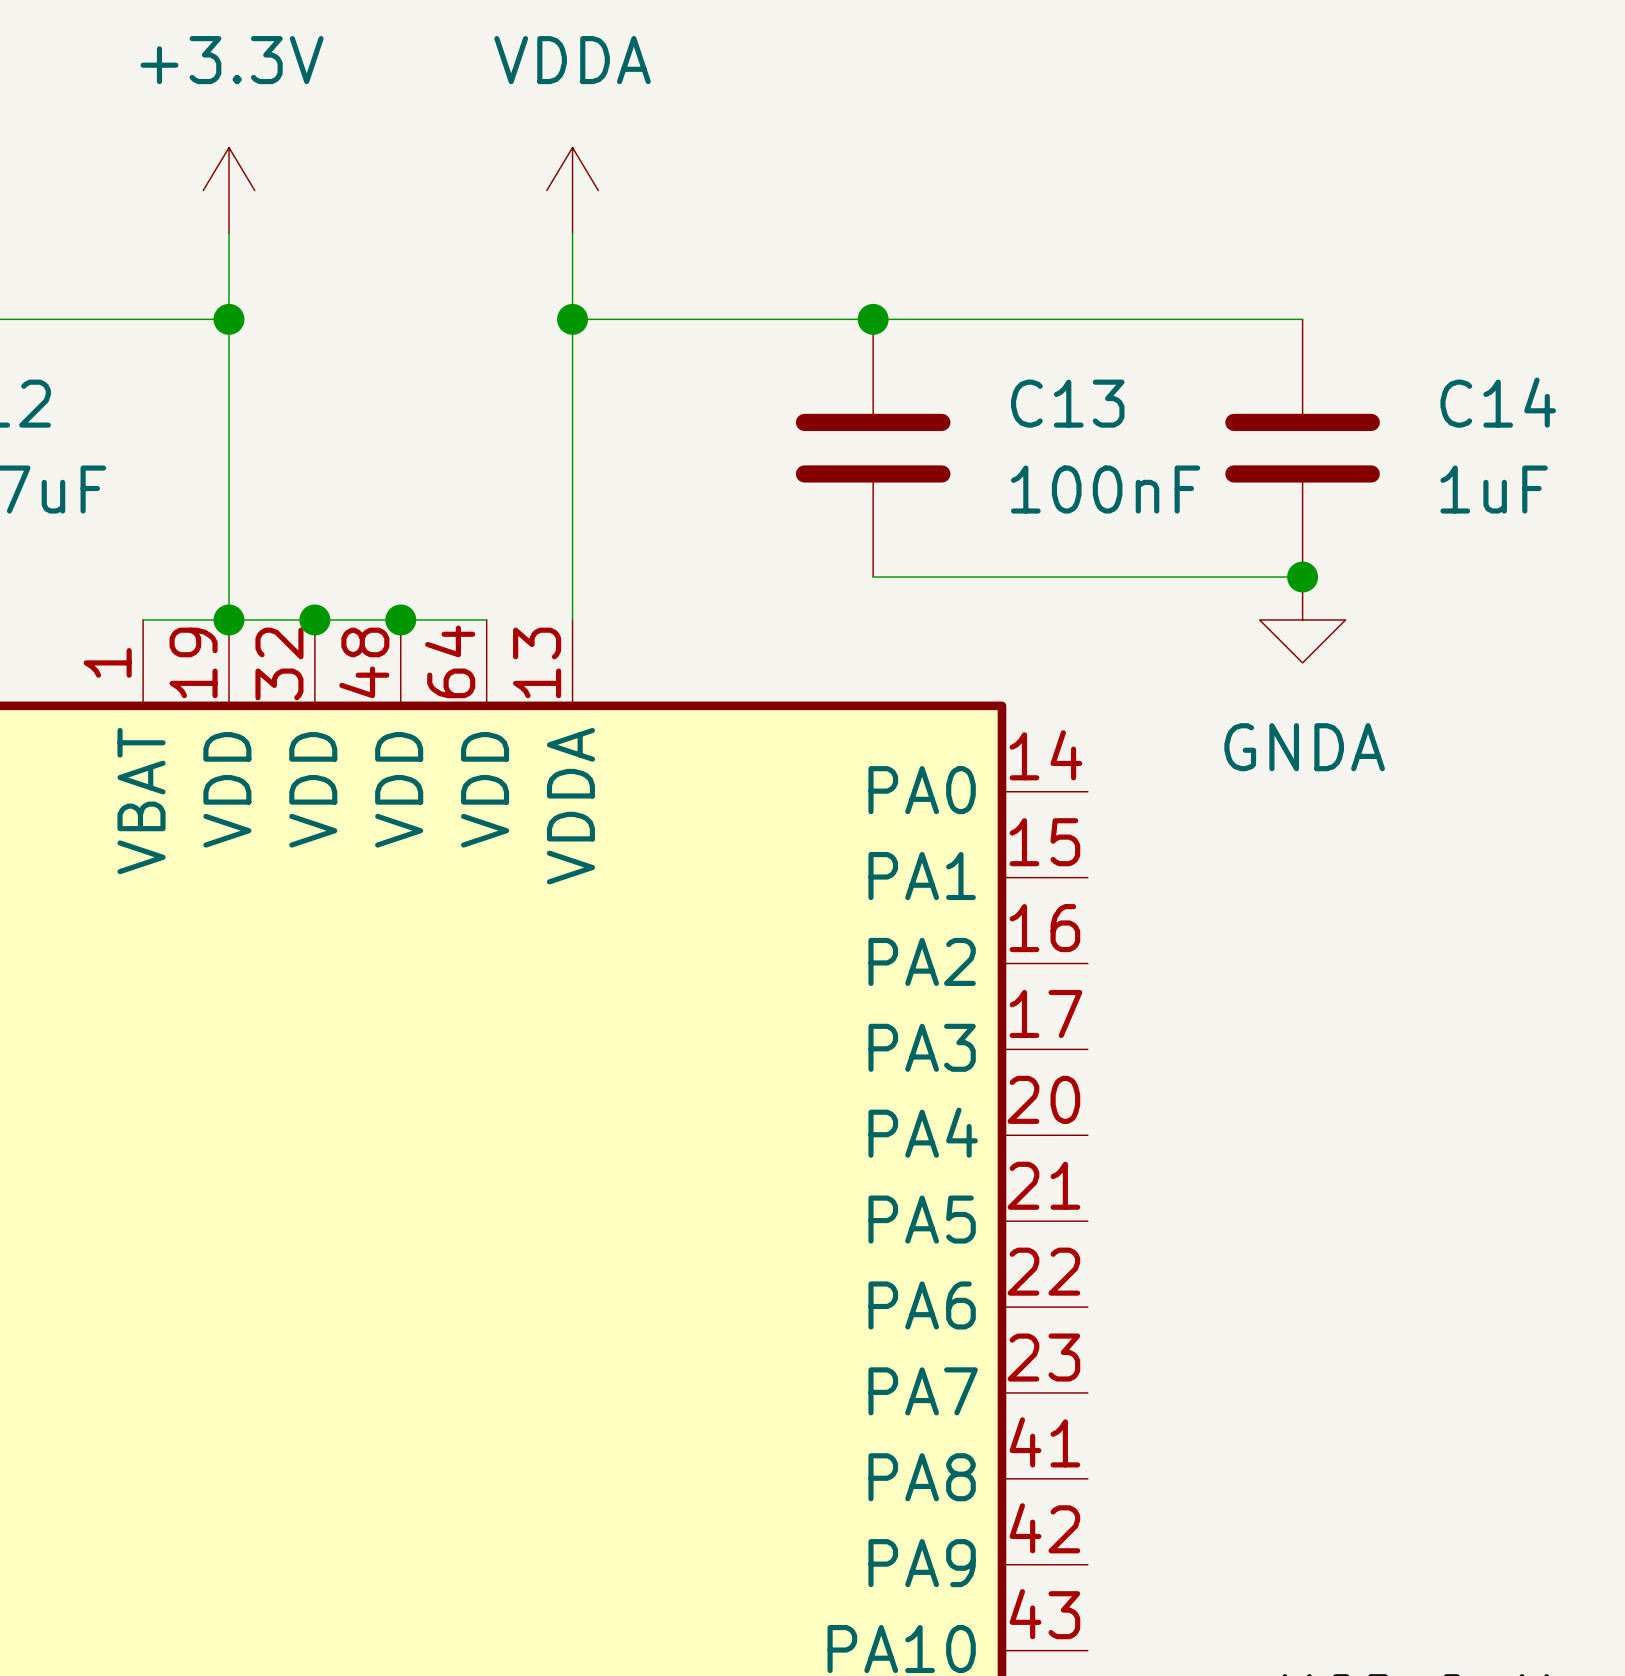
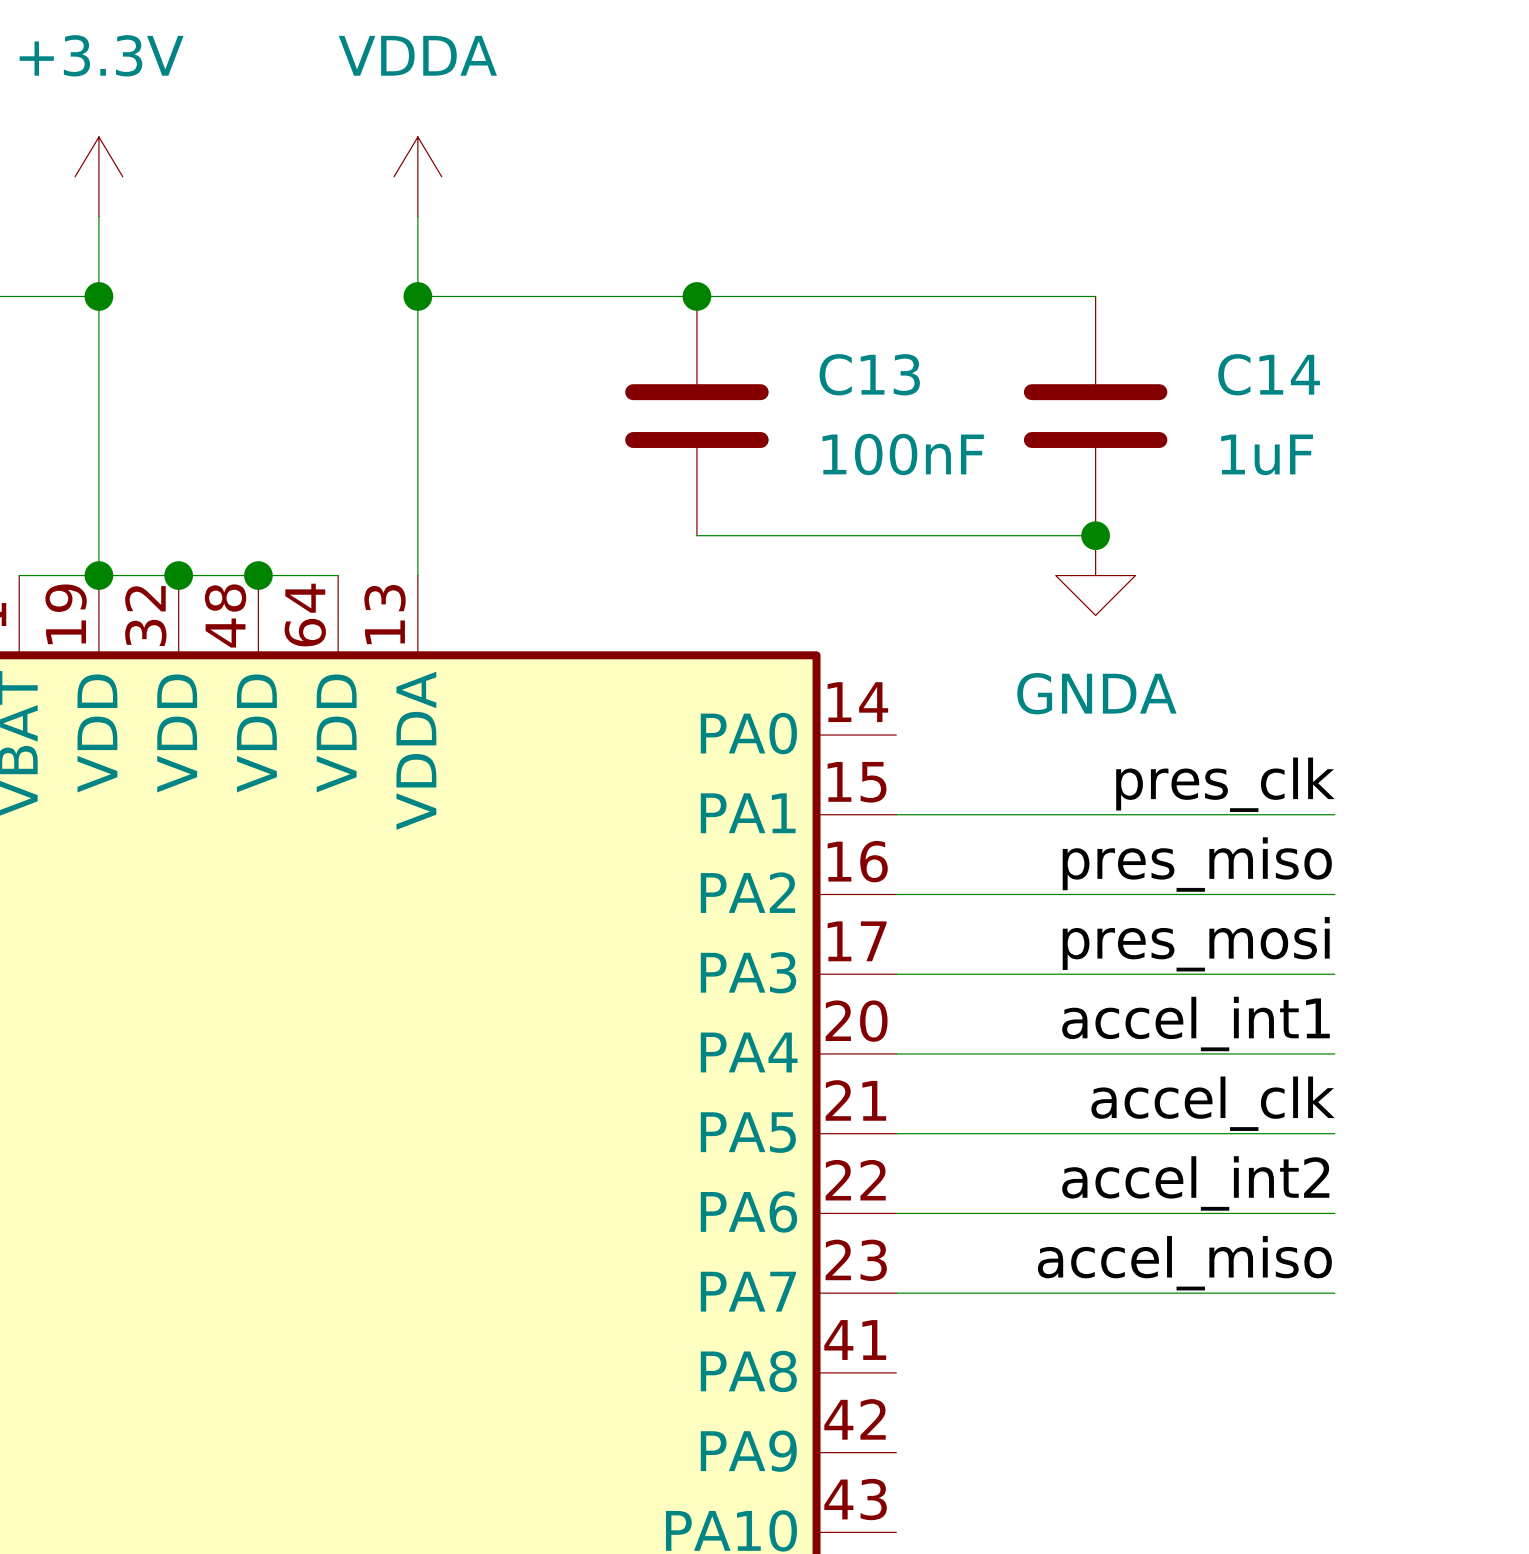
label: none -> pres_clk (1225, 784)
wire: none -> (896, 814) (1334, 814)
label: none -> pres_miso (1197, 864)
wire: none -> (896, 894) (1334, 894)
label: none -> pres_mosi (1196, 944)
wire: none -> (896, 974) (1334, 974)
label: none -> accel_int1 (1195, 1023)
wire: none -> (896, 1053) (1334, 1053)
label: none -> accel_clk (1213, 1103)
wire: none -> (896, 1133) (1334, 1133)
label: none -> accel_int2 (1195, 1183)
wire: none -> (896, 1213) (1334, 1213)
label: none -> accel_miso (1184, 1263)
wire: none -> (896, 1293) (1334, 1293)

